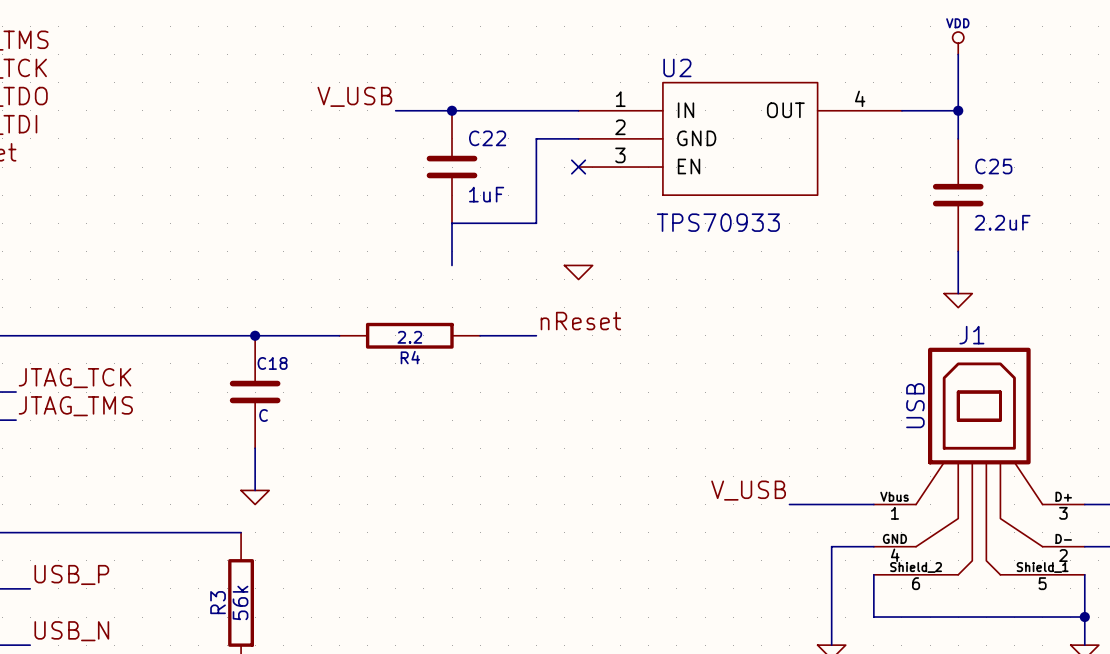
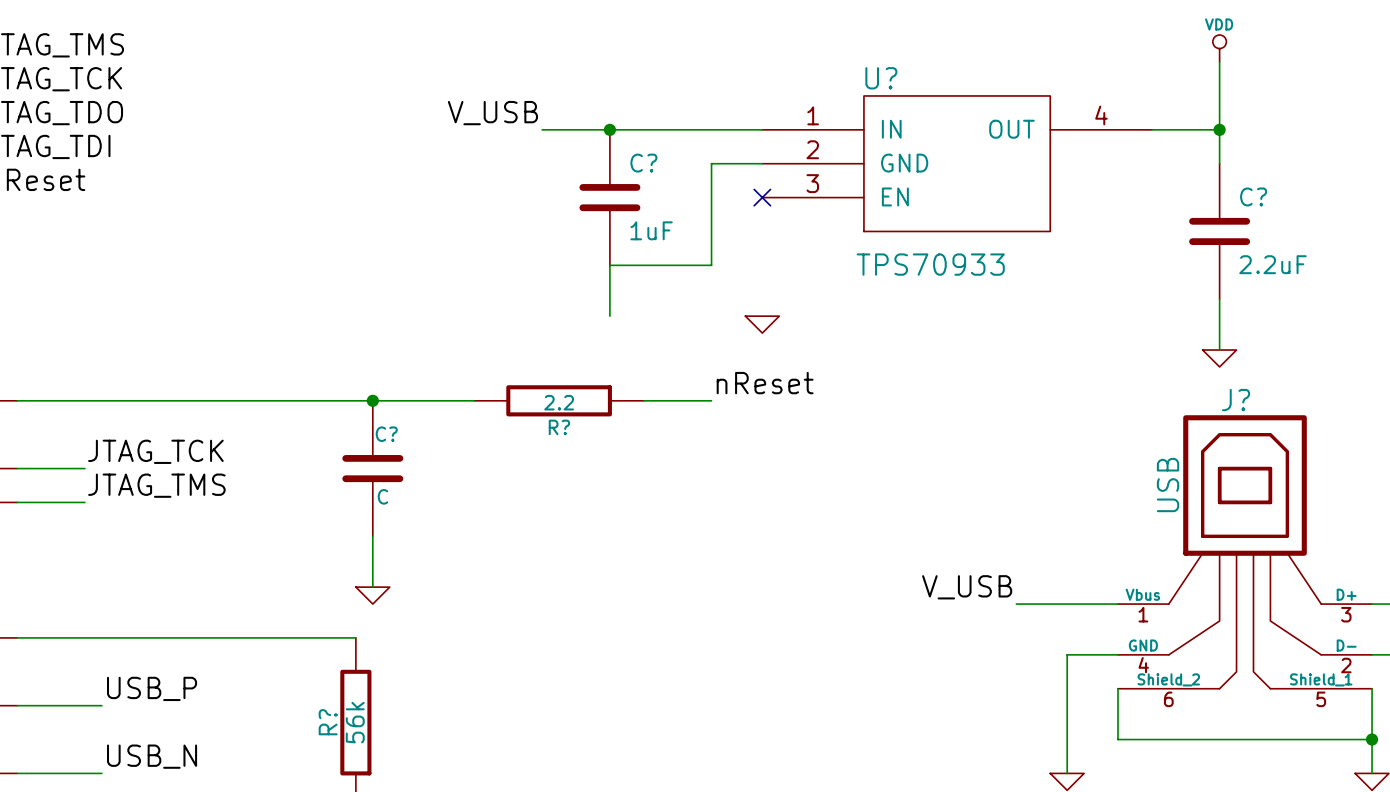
U2 name: U2 (677, 67) -> U? (881, 78)
C22 name: C22 (487, 138) -> C? (643, 163)
C25 name: C25 (993, 166) -> C? (1253, 196)
J1 name: J1 (971, 335) -> J? (1236, 400)
R4 name: R4 (410, 357) -> R? (559, 427)
C18 name: C18 (272, 363) -> C? (386, 434)
R3 name: R3 (218, 602) -> R? (328, 722)

